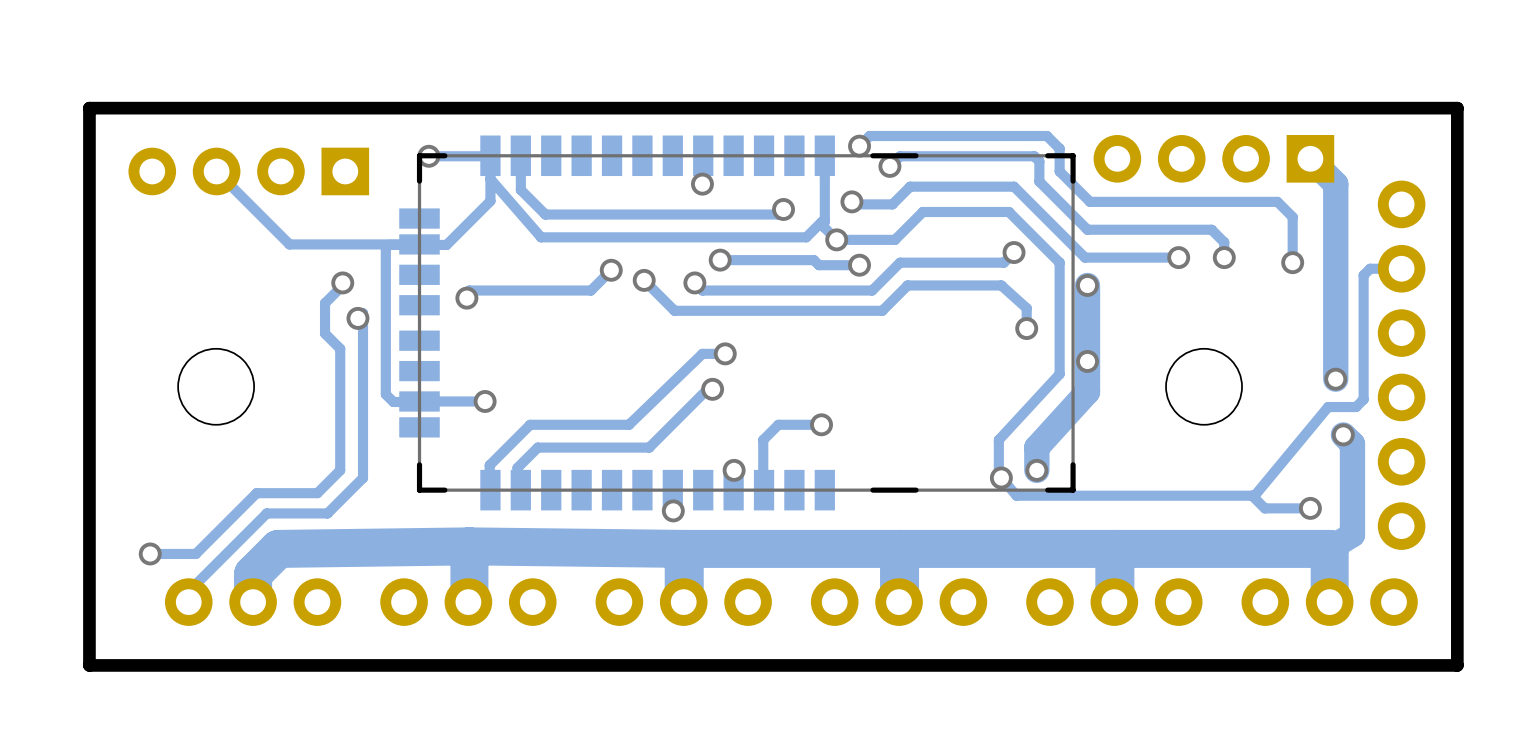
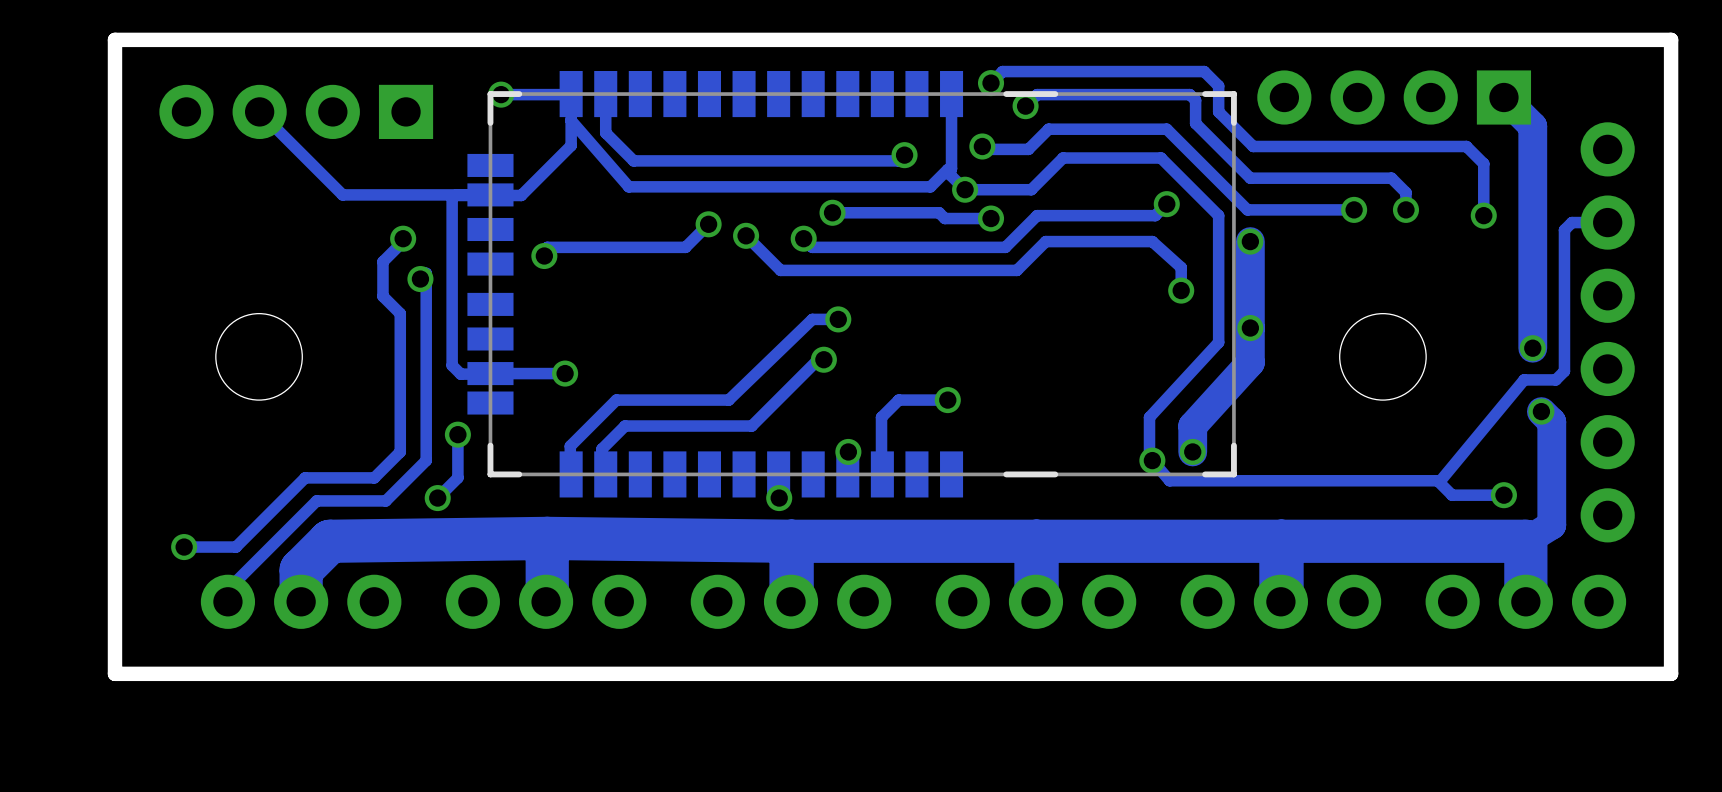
via: (702, 184) -> none
track: none -> (457, 434) (457, 477) (437, 498)
via: none -> (457, 434)
via: none -> (437, 498)

